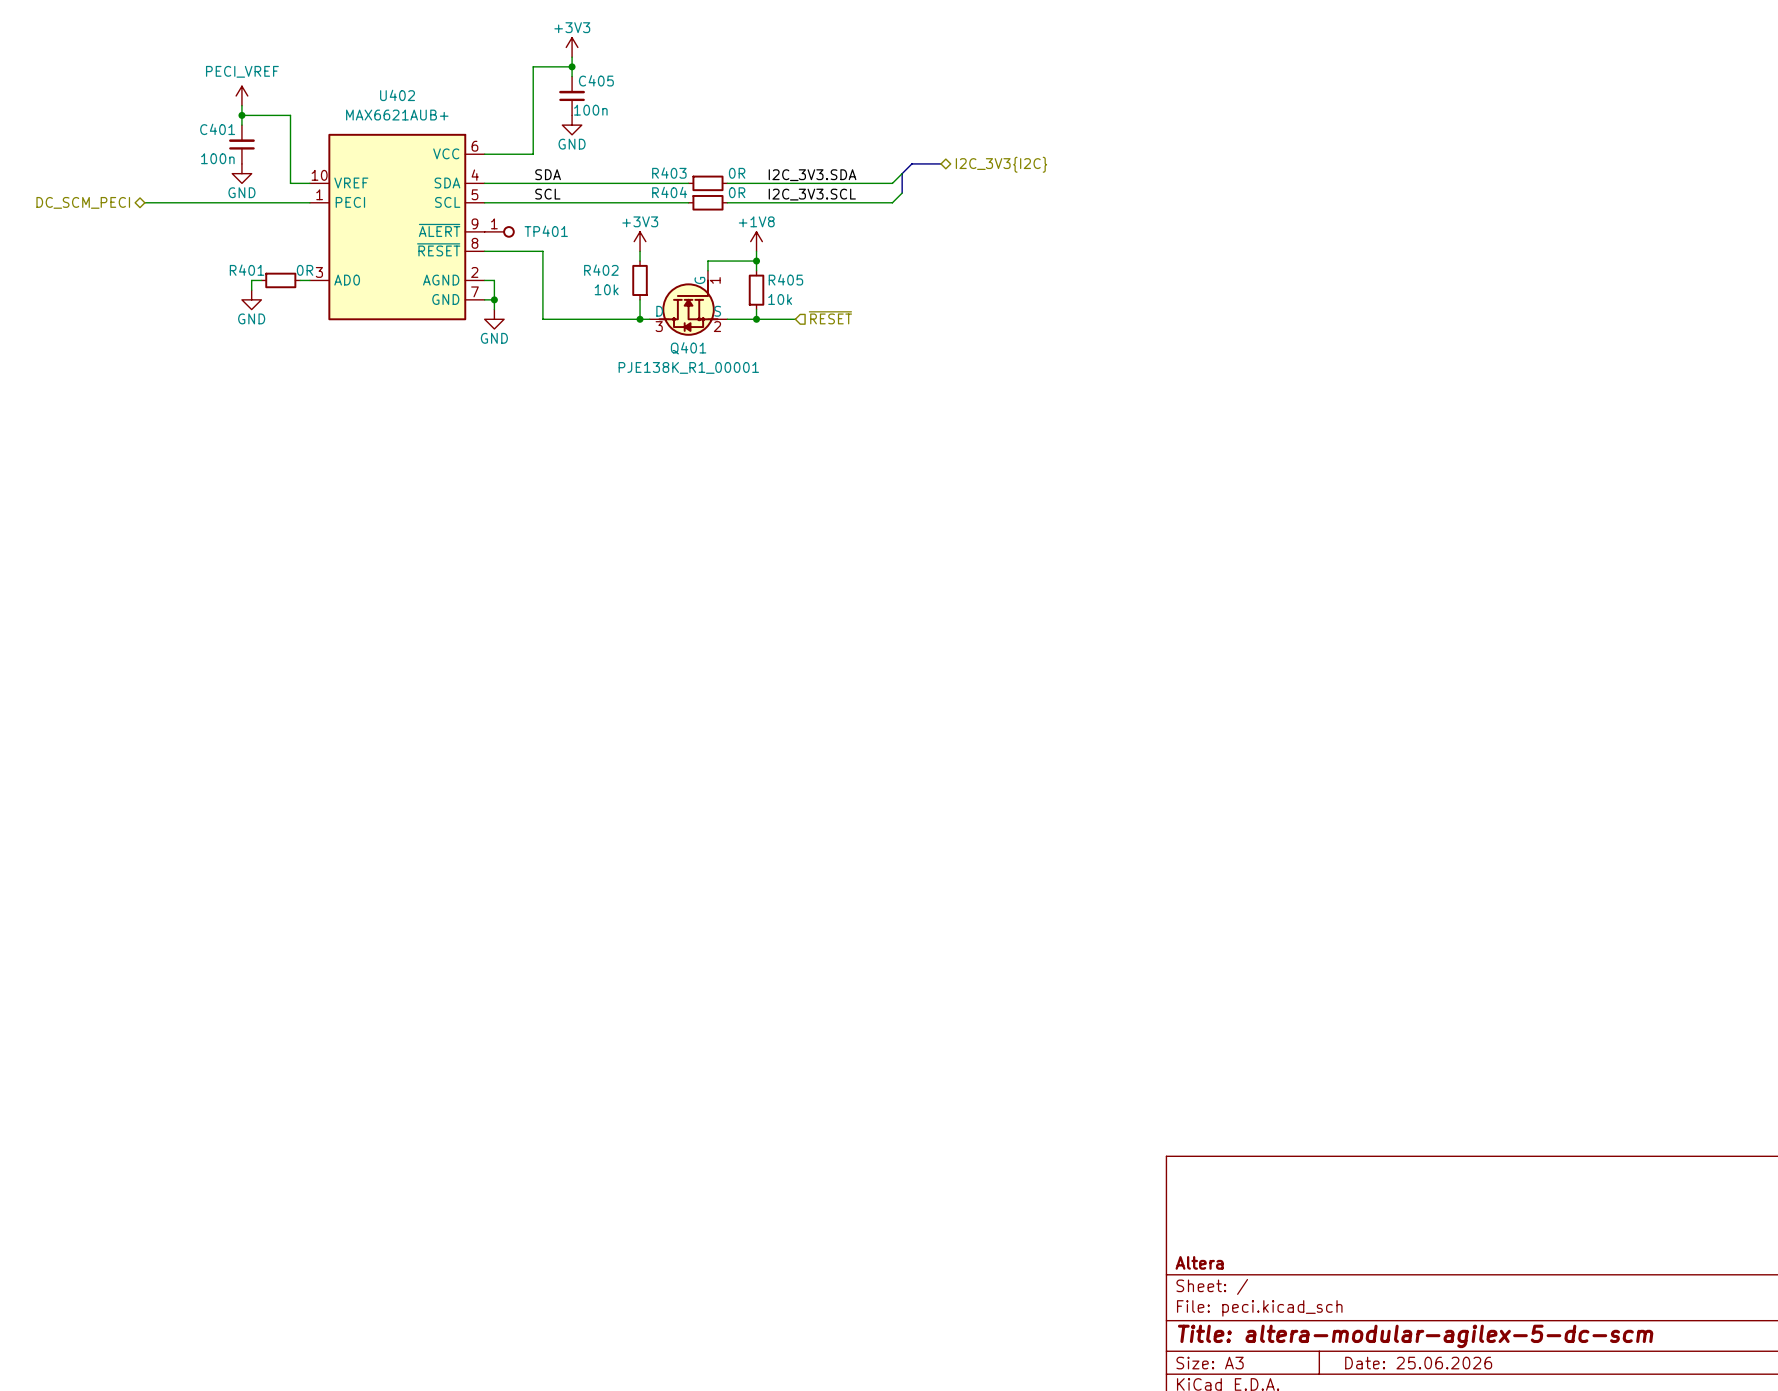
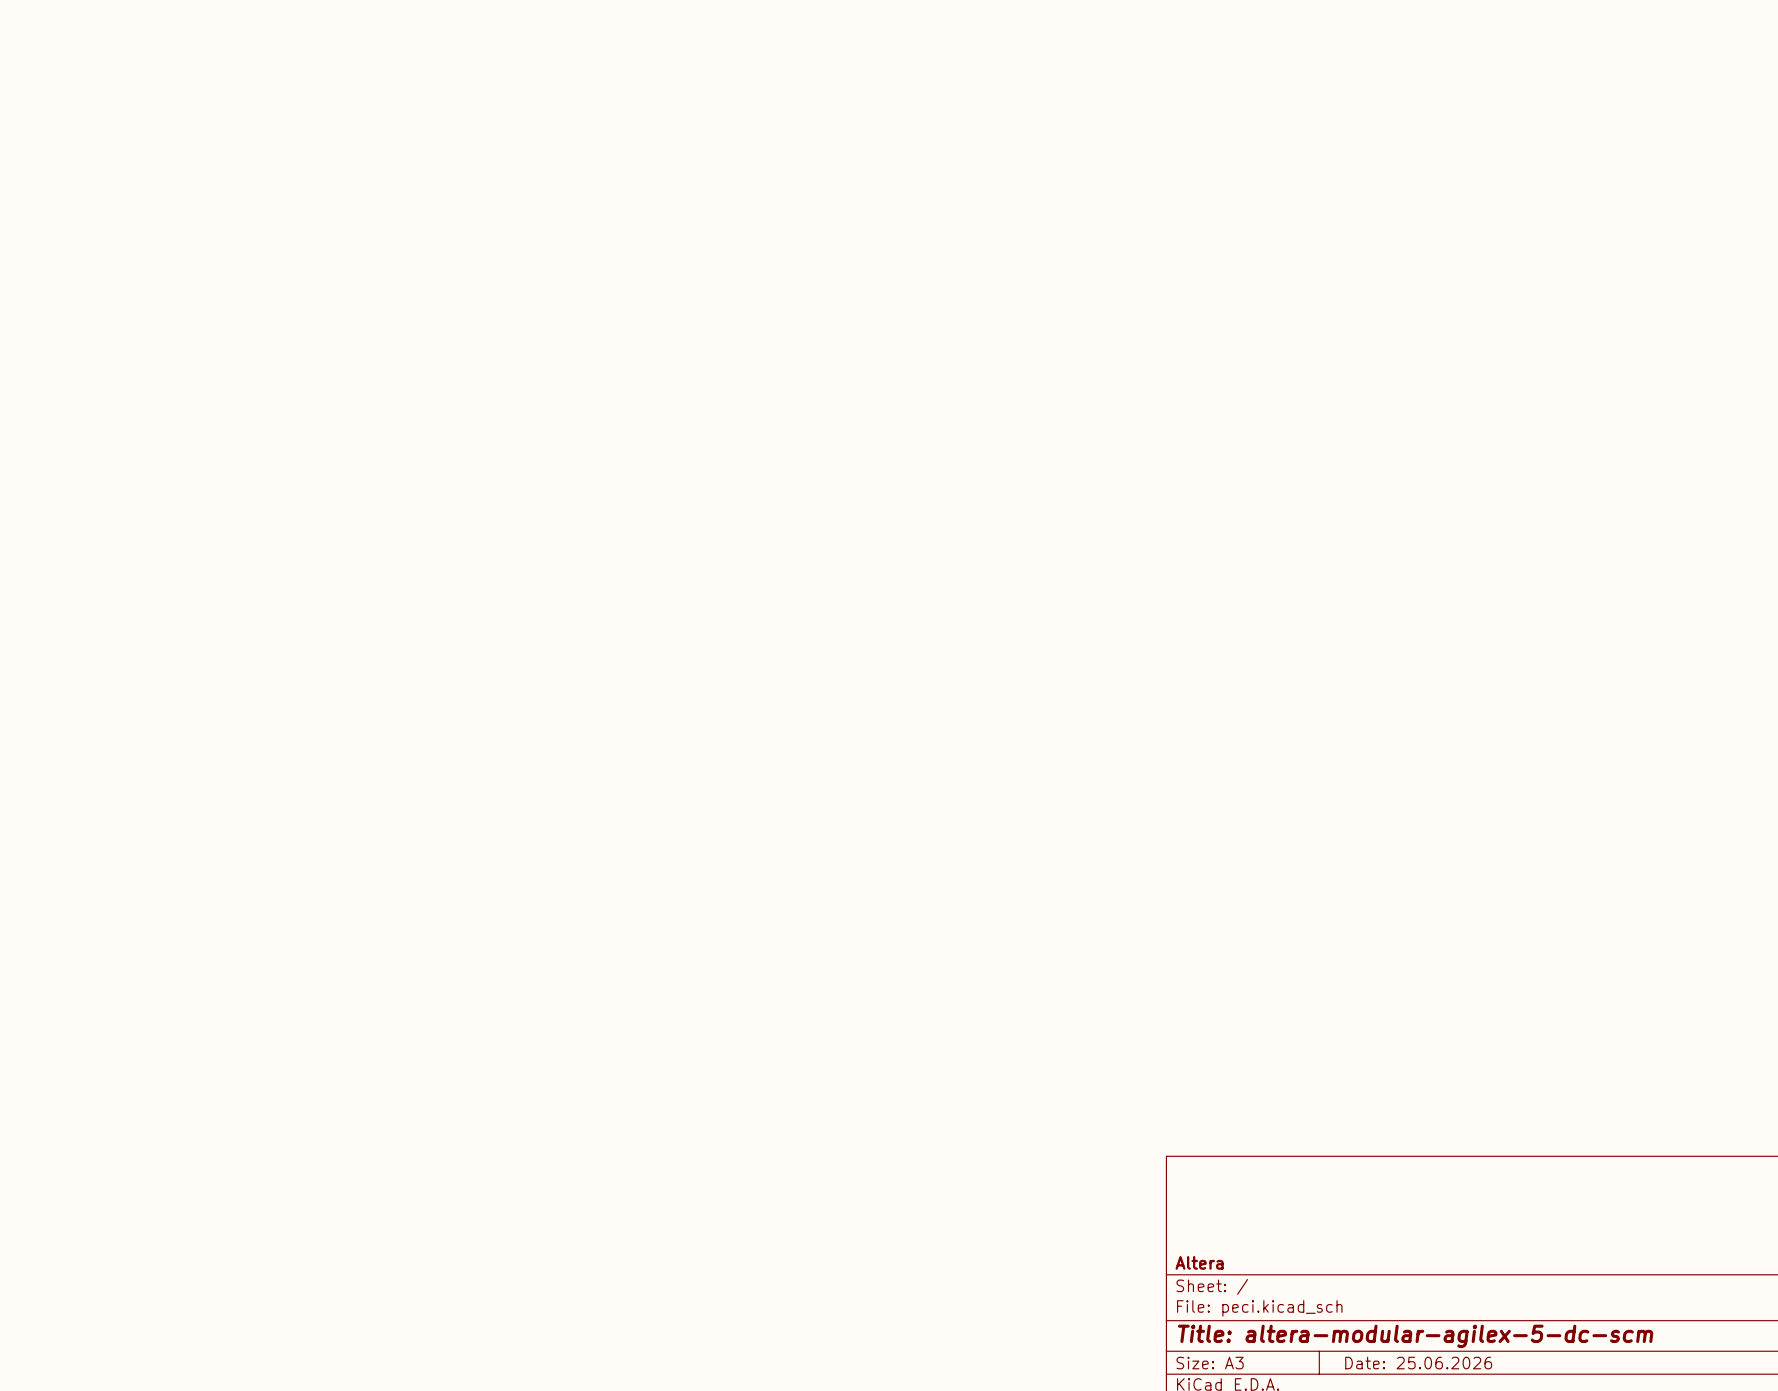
power symbol: +3V3 (572, 47) -> none
wire: (572, 57) (572, 76) -> none
wire: (572, 66) (533, 66) (533, 154) (484, 154) -> none
junction: (572, 66) -> none
power symbol: PECI_VREF (241, 95) -> none
C405: (572, 95) -> none
wire: (241, 105) (241, 125) -> none
wire: (241, 115) (290, 115) (290, 183) (309, 183) -> none
junction: (241, 115) -> none
power symbol: GND (572, 125) -> none
C401: (241, 144) -> none
bus: (940, 163) (911, 163) (902, 173) (902, 193) -> none
hierarchical label: I2C_3V3{I2C} (1001, 164) -> none
power symbol: GND (241, 173) -> none
wire: (902, 173) (892, 183) (727, 183) -> none
label: SDA (548, 174) -> none
label: I2C_3V3.SDA (812, 175) -> none
wire: (484, 183) (688, 183) -> none
R403: (707, 183) -> none
wire: (902, 193) (892, 202) (727, 202) -> none
label: SCL (547, 194) -> none
label: I2C_3V3.SCL (812, 194) -> none
hierarchical label: DC_SCM_PECI (83, 202) -> none
wire: (144, 202) (309, 202) -> none
wire: (484, 202) (688, 202) -> none
R404: (707, 202) -> none
U402: (397, 227) -> none
TP401: (499, 231) -> none
power symbol: +3V3 (640, 241) -> none
power symbol: +1V8 (756, 241) -> none
wire: (484, 251) (542, 251) (542, 319) (649, 319) -> none
wire: (640, 251) (640, 261) -> none
wire: (756, 251) (756, 270) -> none
wire: (756, 261) (707, 261) (707, 270) -> none
junction: (756, 261) -> none
wire: (261, 280) (251, 280) (251, 290) -> none
R401: (280, 280) -> none
wire: (300, 280) (309, 280) -> none
wire: (484, 280) (494, 280) (494, 309) -> none
R402: (640, 280) -> none
R405: (756, 290) -> none
power symbol: GND (251, 299) -> none
wire: (484, 299) (494, 299) -> none
junction: (494, 299) -> none
wire: (640, 299) (640, 319) -> none
Q401: (688, 303) -> none
wire: (756, 309) (756, 319) -> none
hierarchical label: ~{RESET} (830, 317) -> none
power symbol: GND (494, 319) -> none
junction: (640, 319) -> none
wire: (727, 319) (795, 319) -> none
junction: (756, 319) -> none

